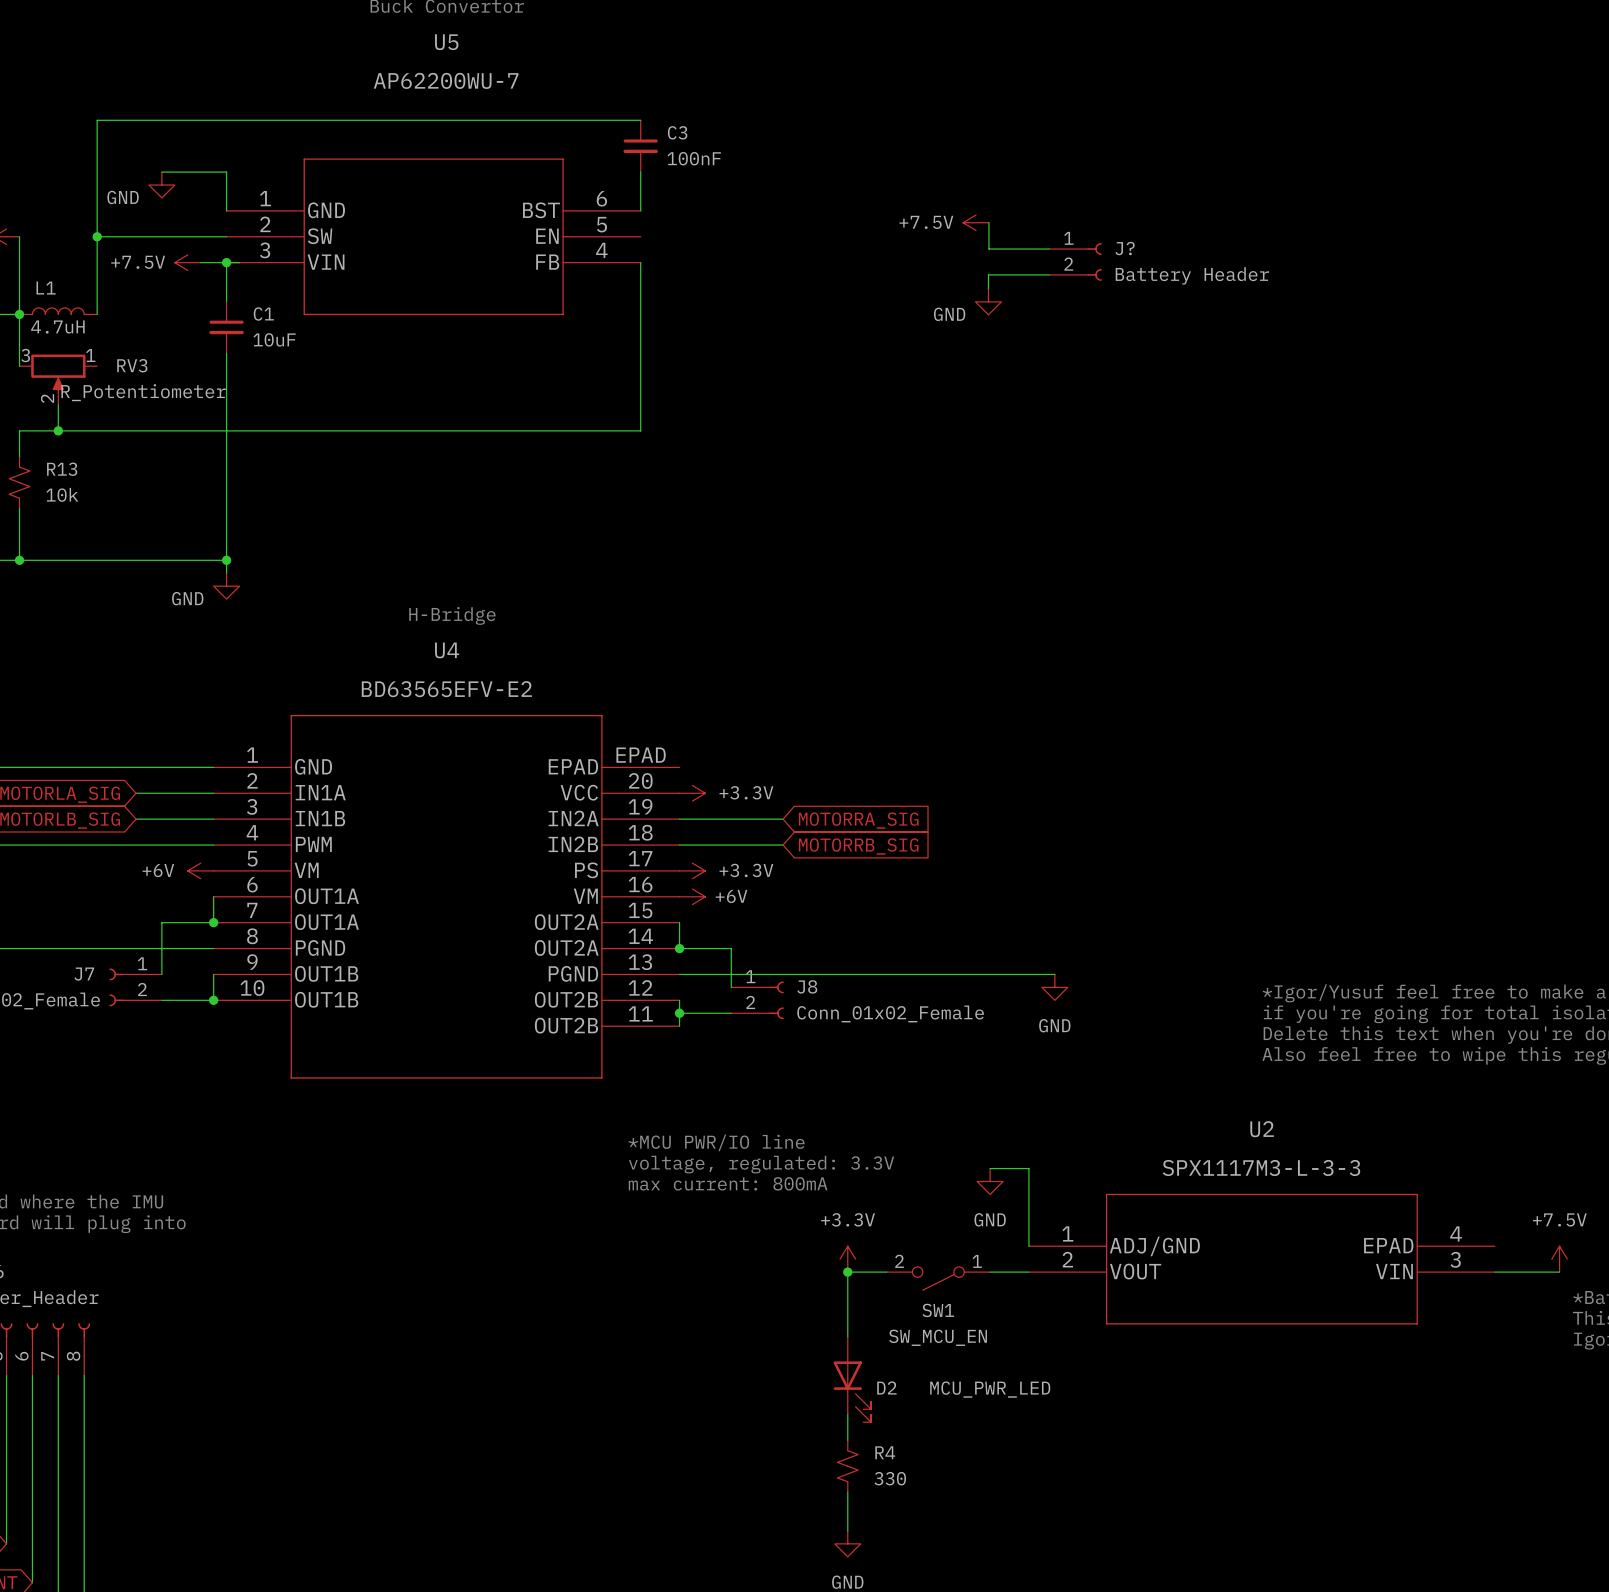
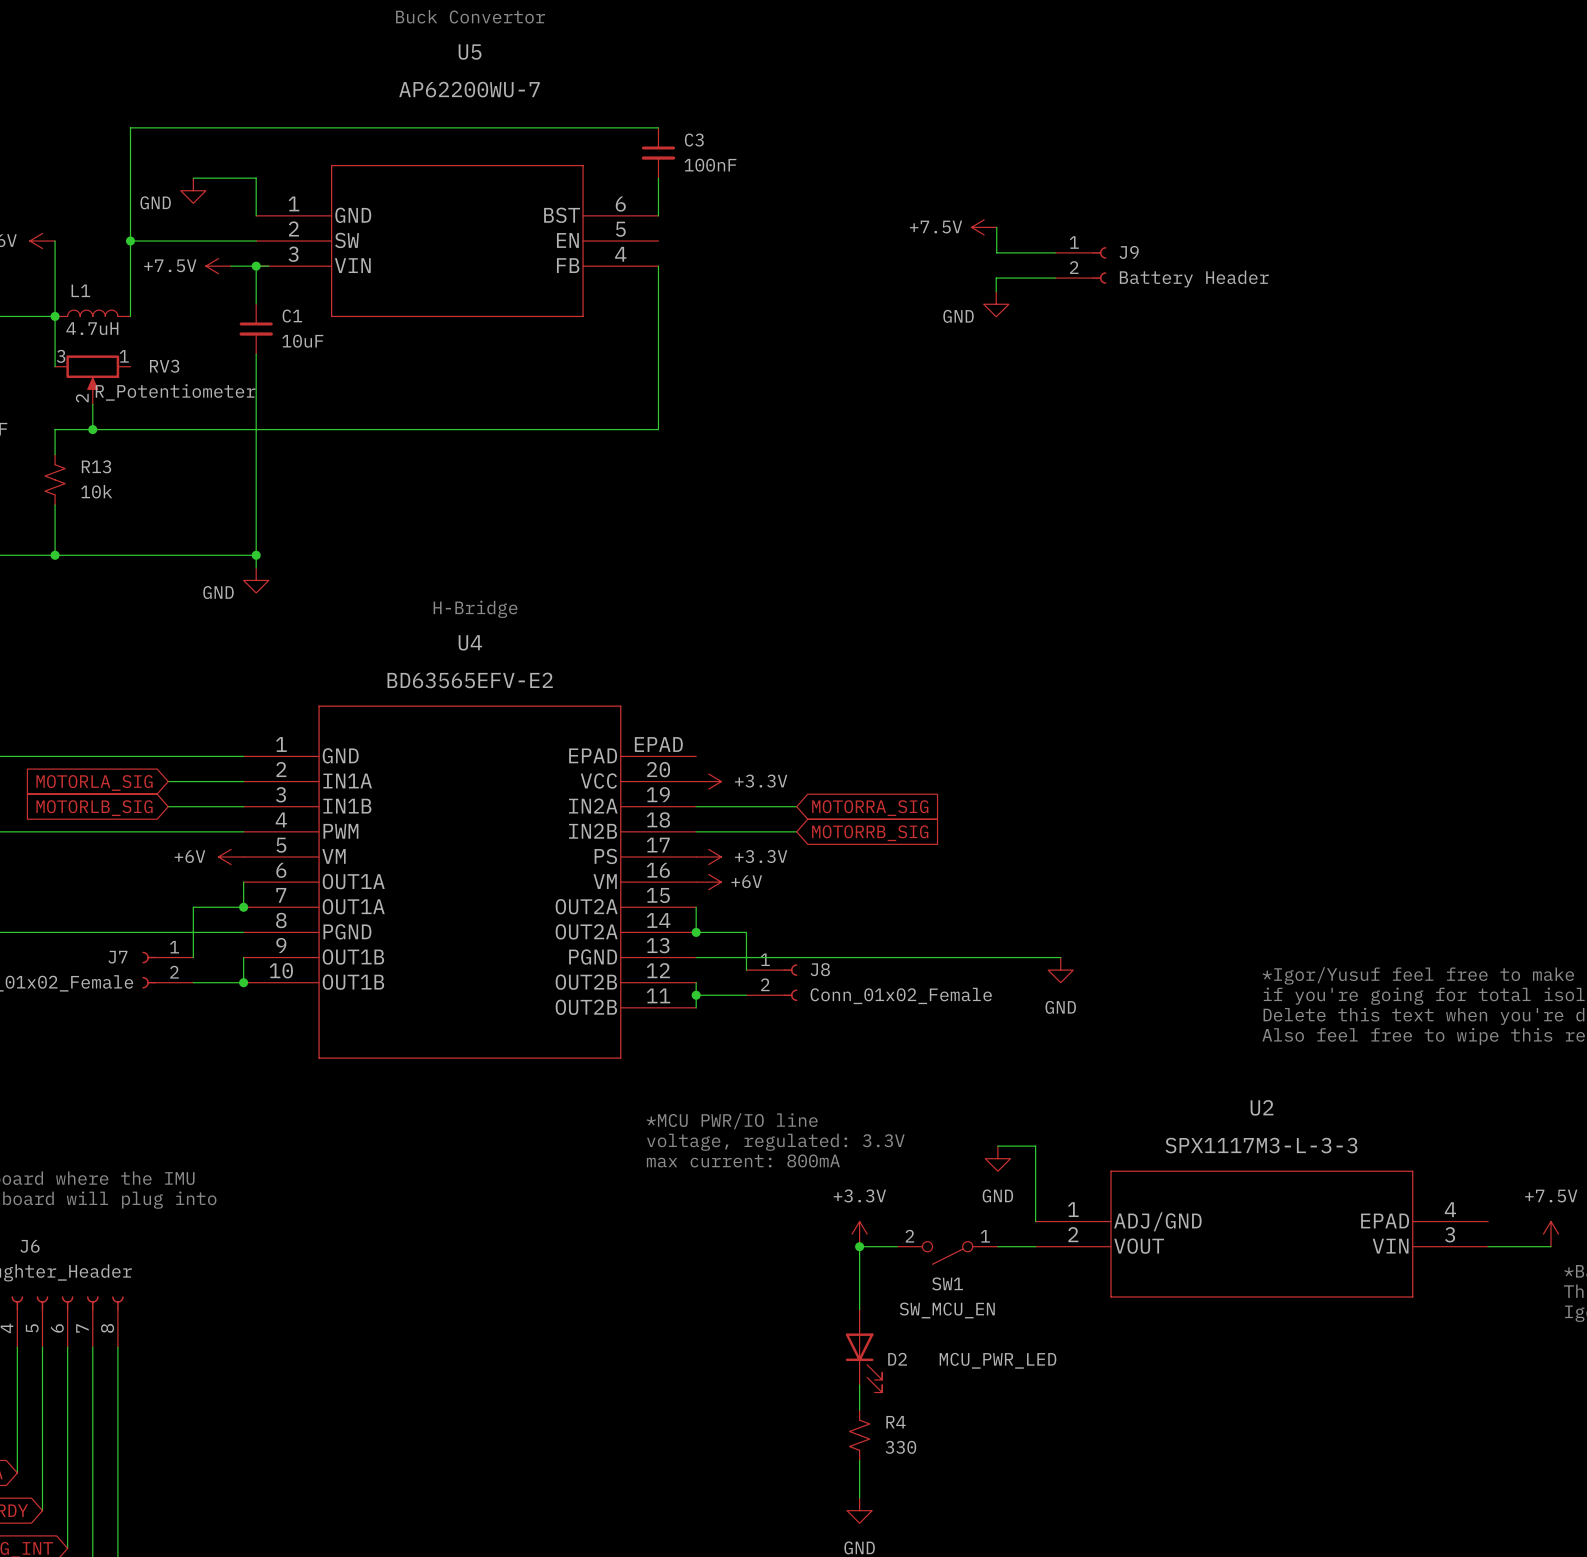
J? name: J? (1125, 248) -> J9 (1129, 252)

